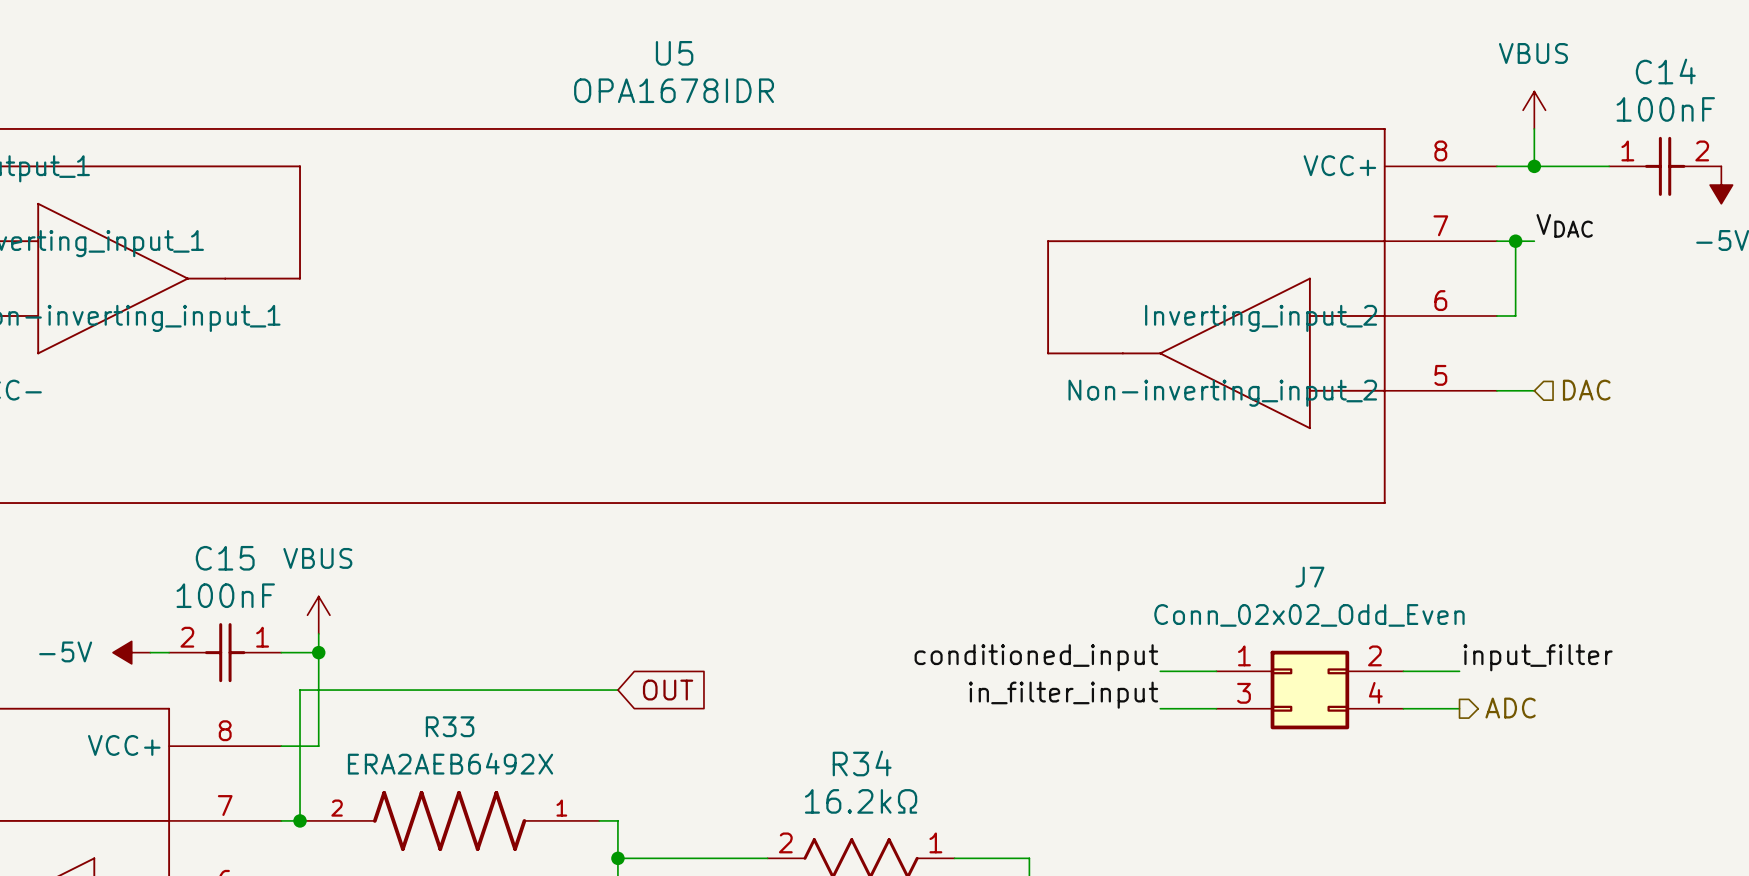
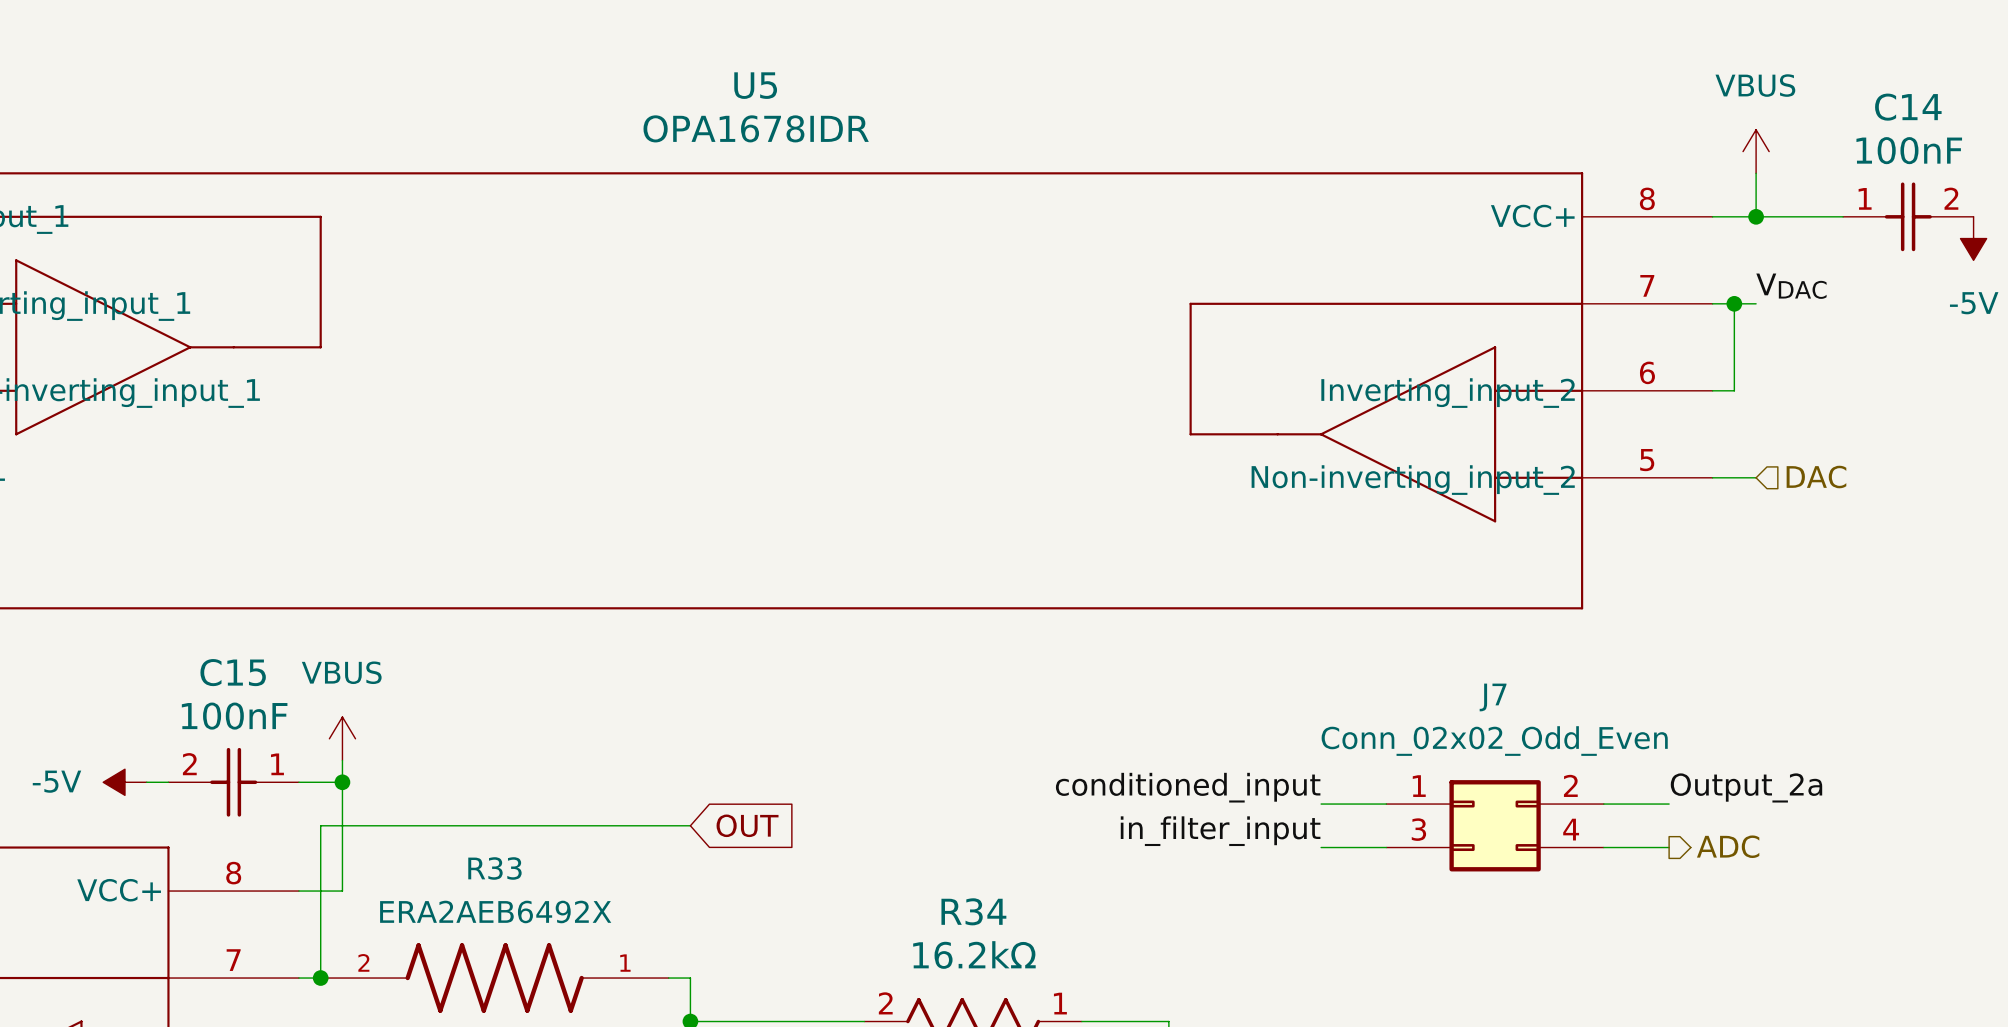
label: input_filter (1538, 657) -> Output_2a (1746, 787)

